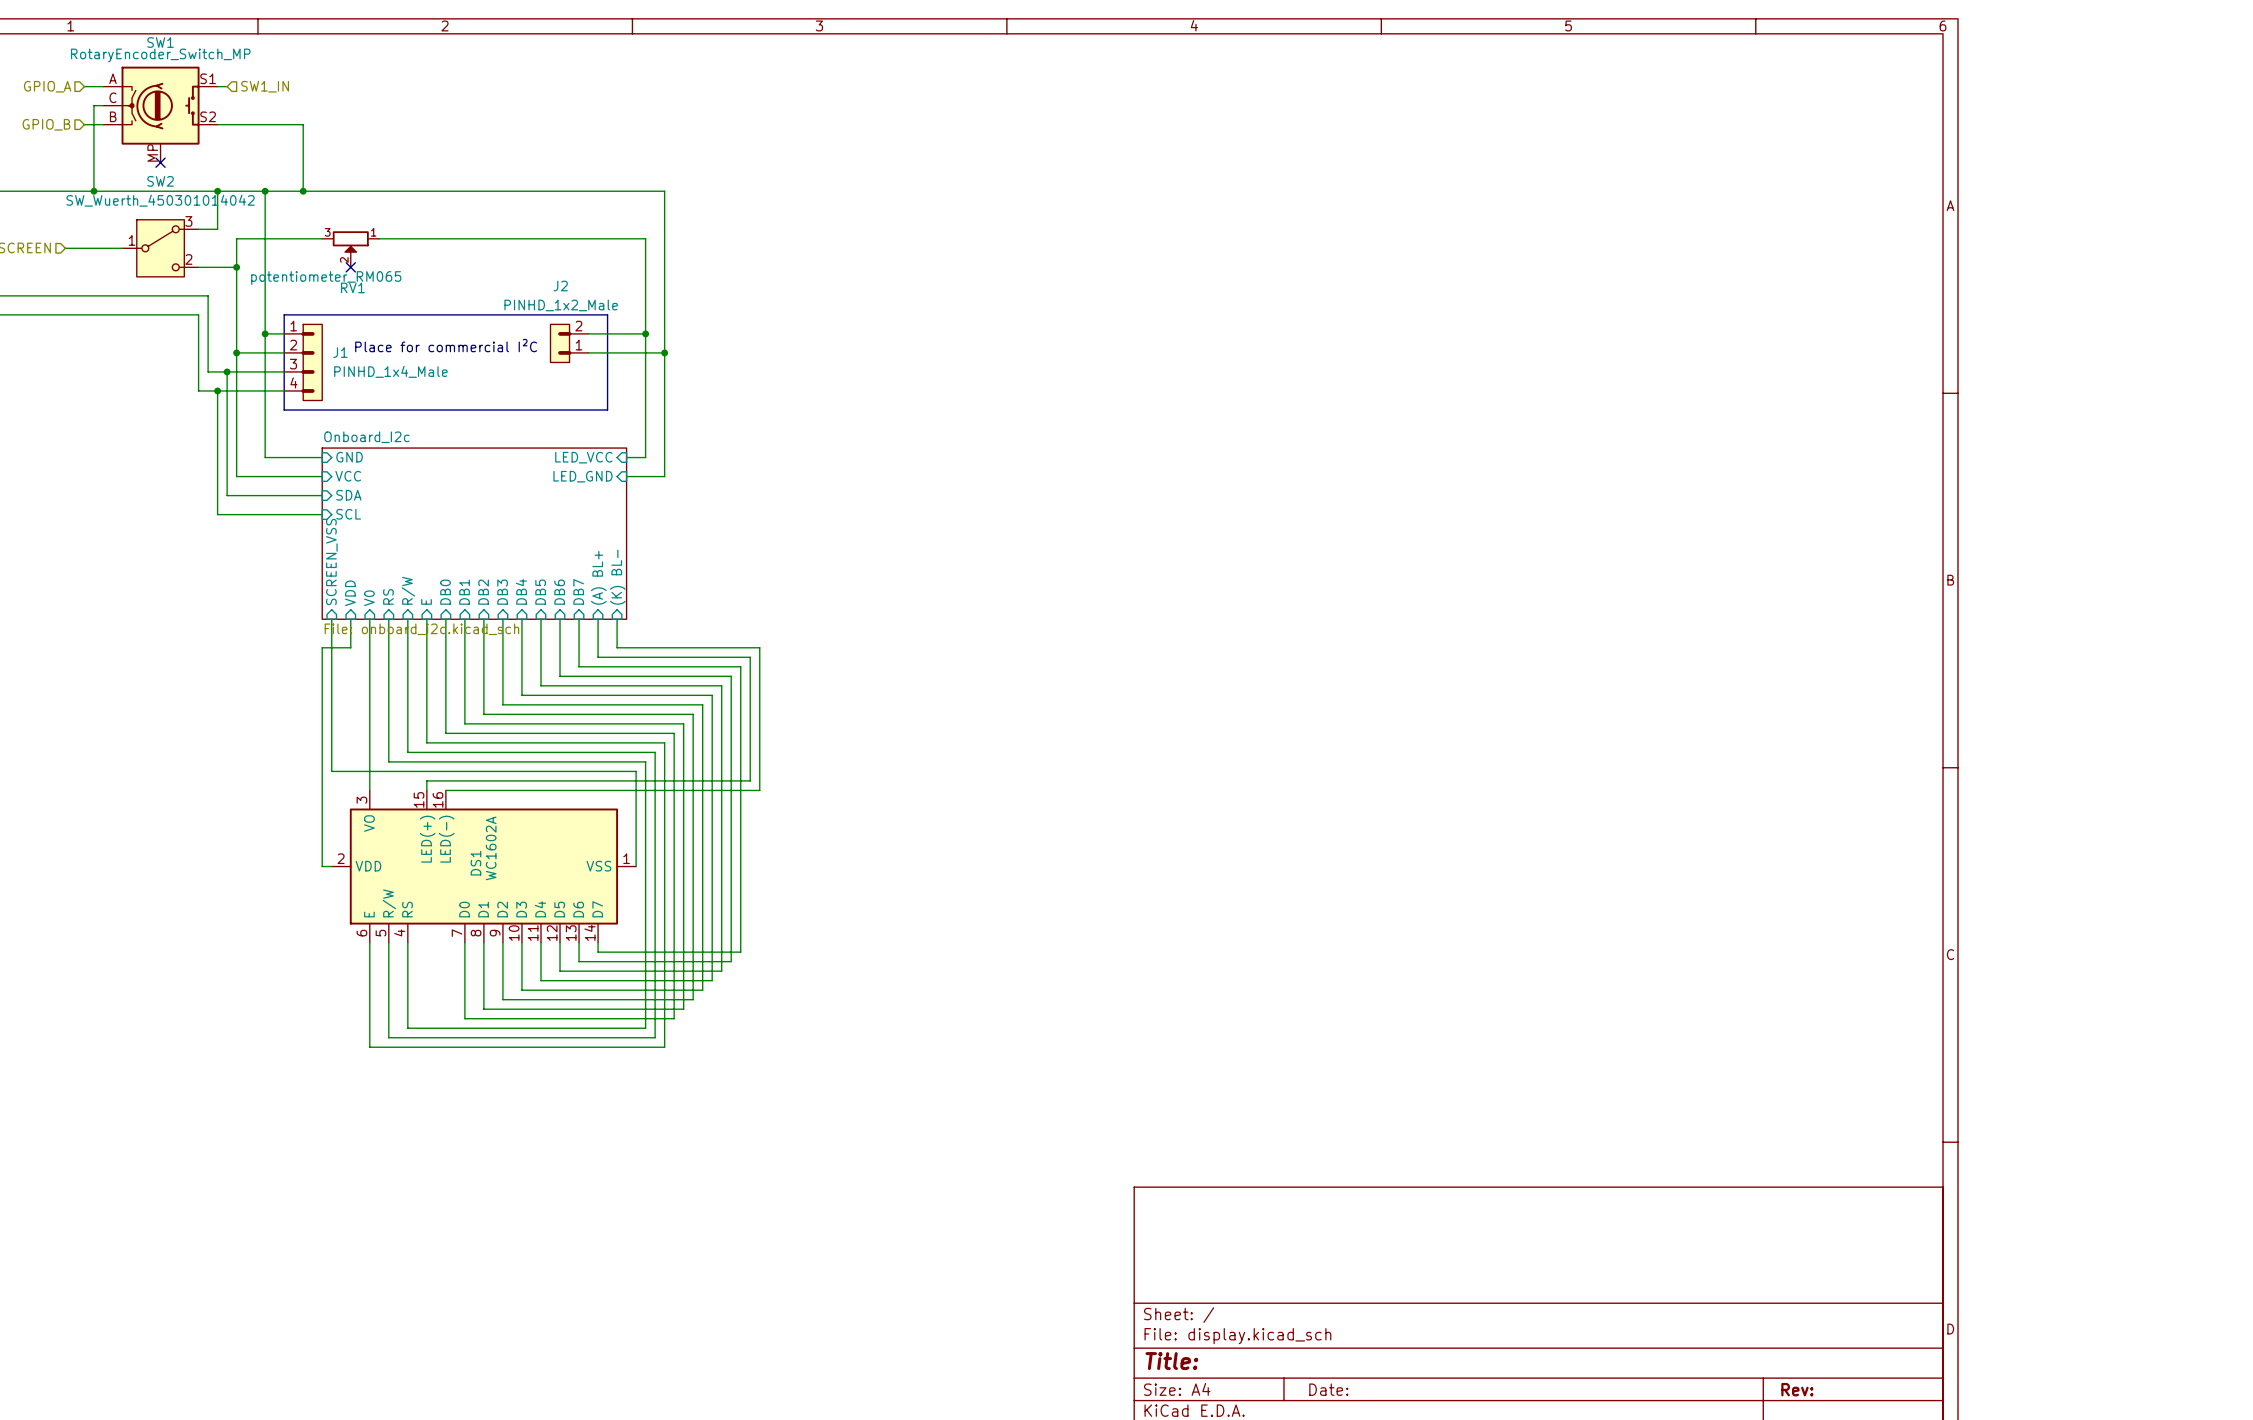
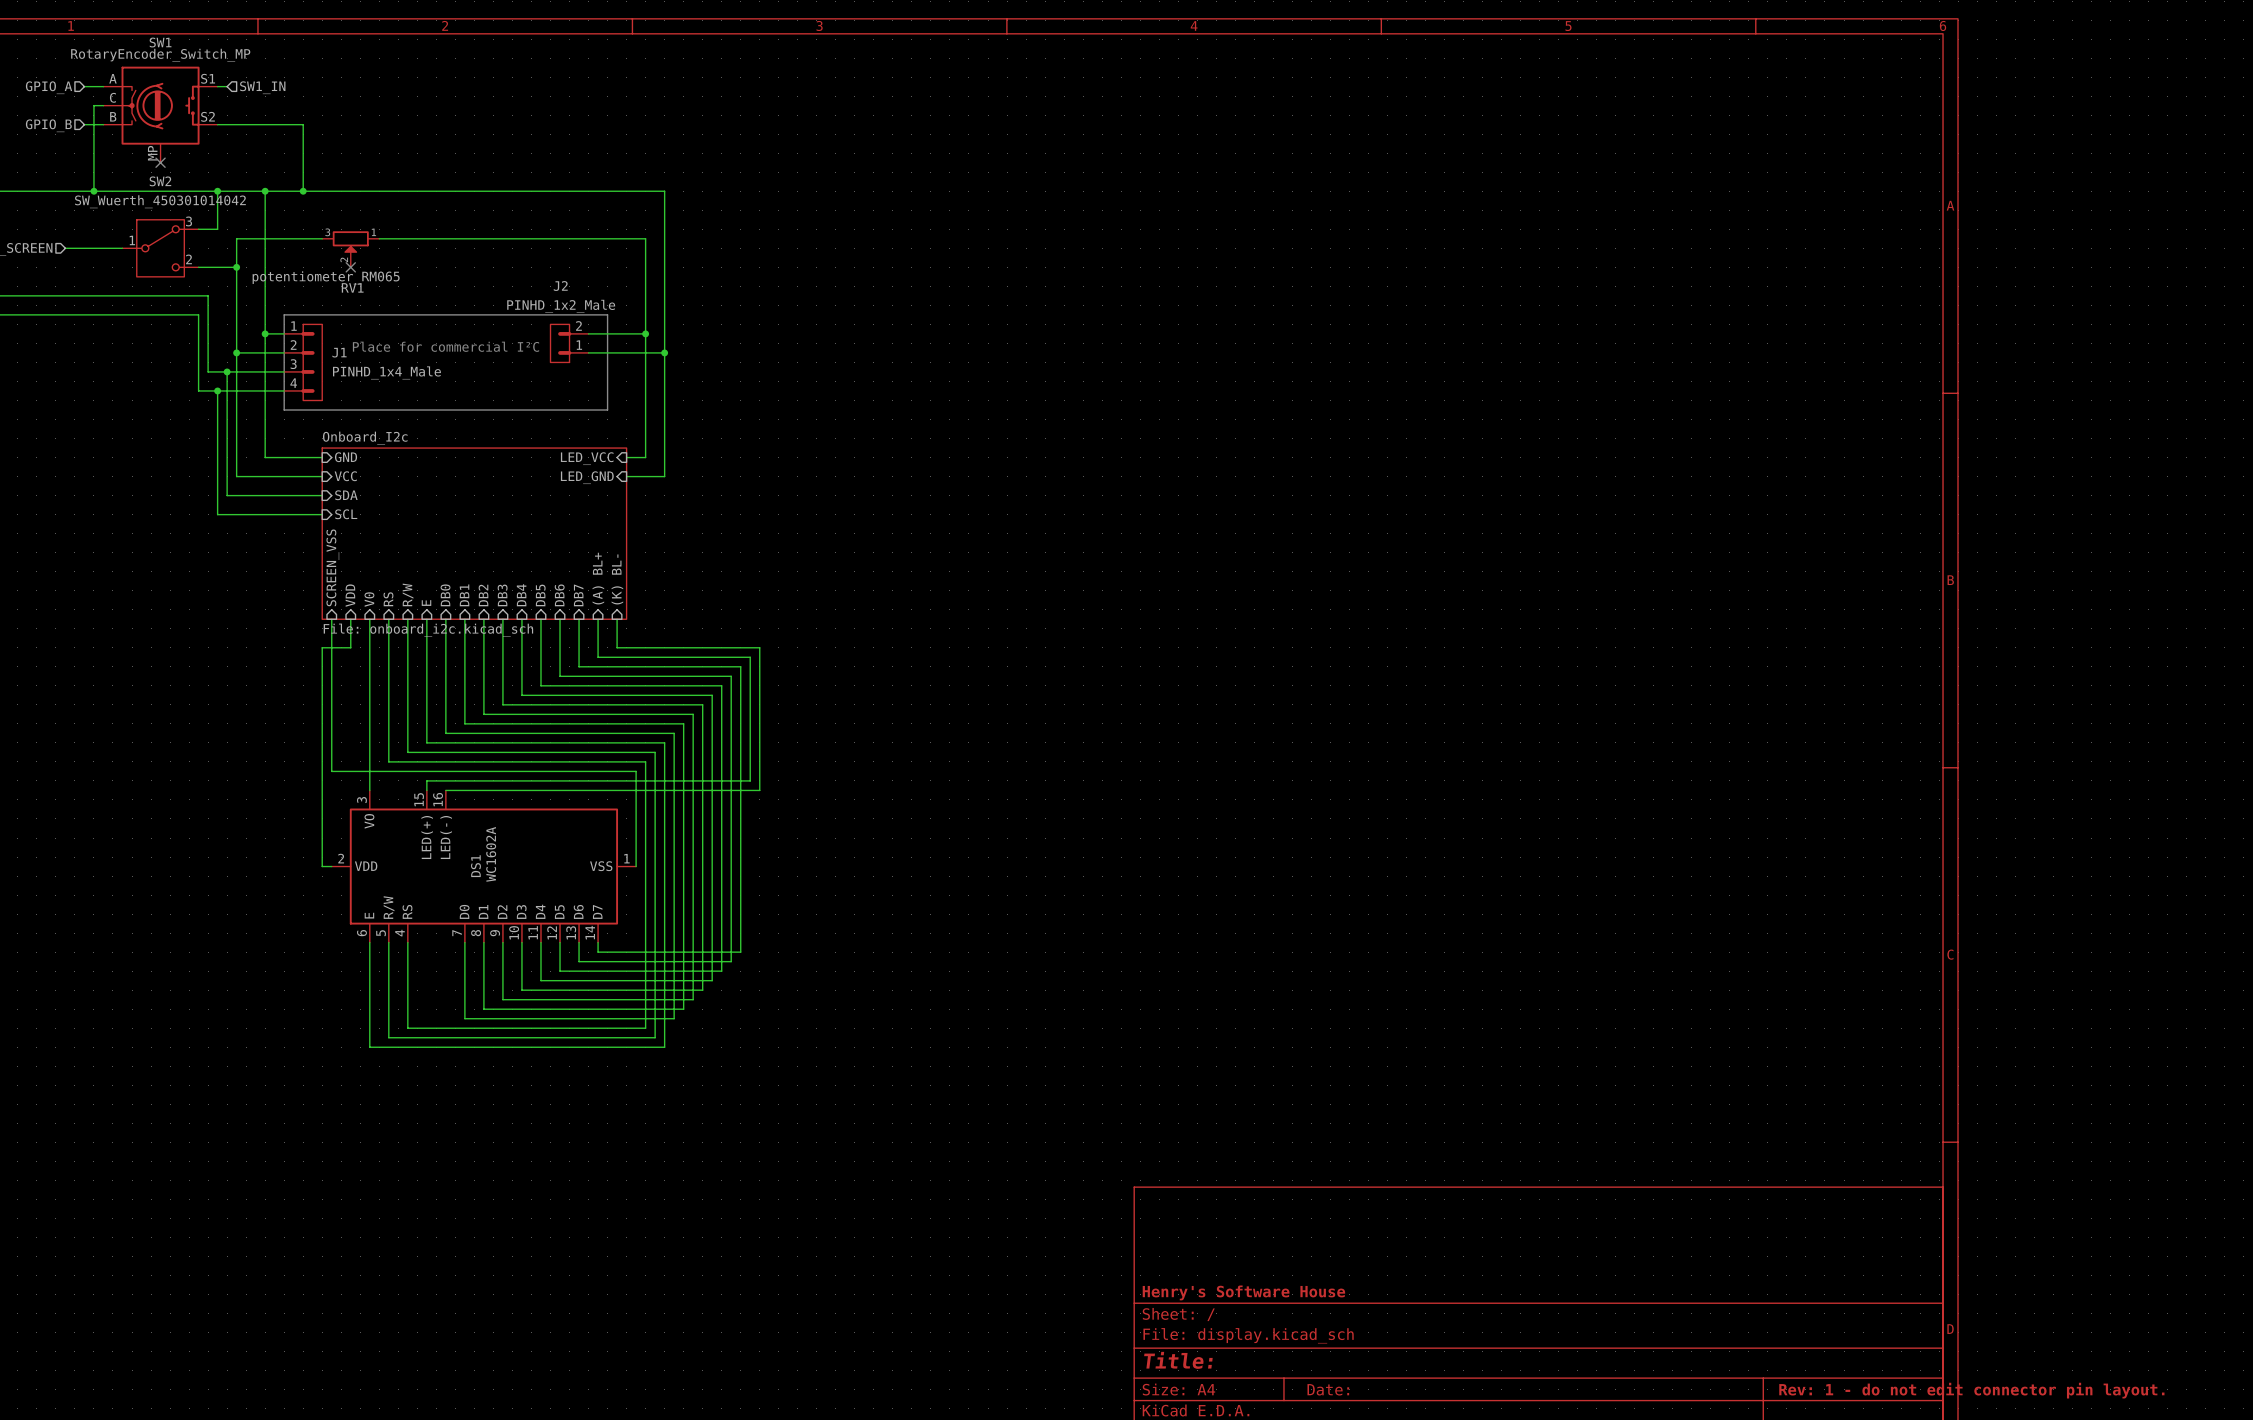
title block: none -> Henry's Software House (1243, 1292)
title block: Rev: (1797, 1389) -> Rev: 1 - do not edit connector pin layout. (1971, 1390)

